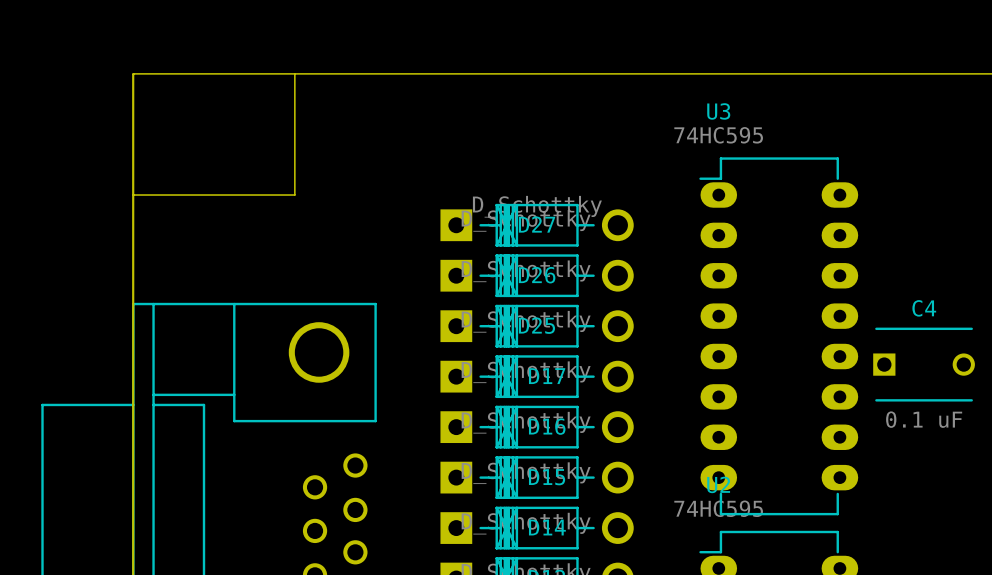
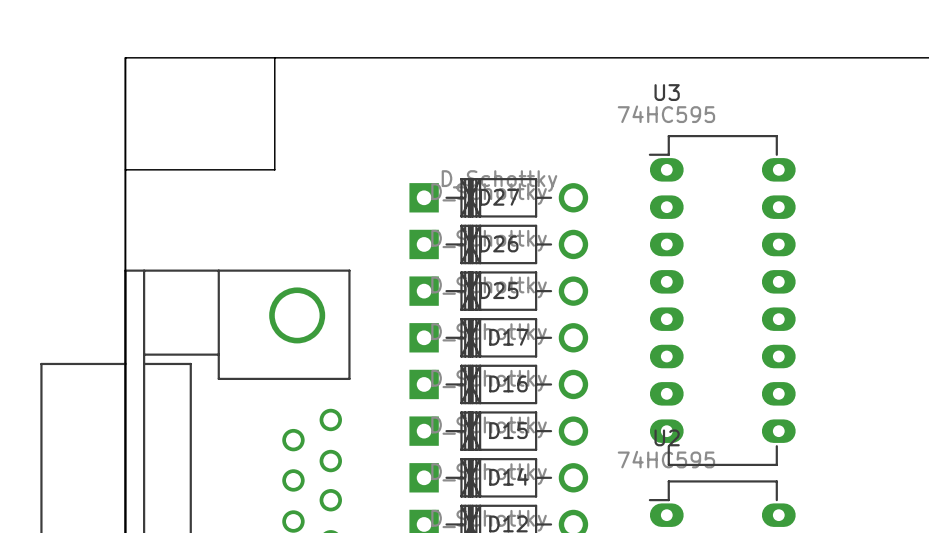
C4: 0.1 uF (924, 364) -> none

